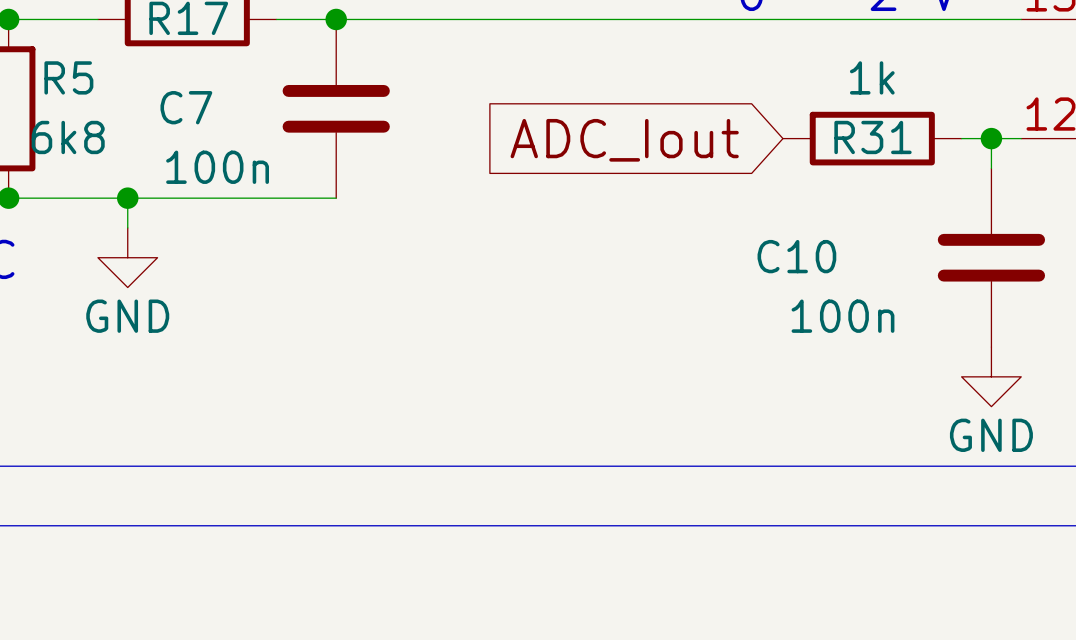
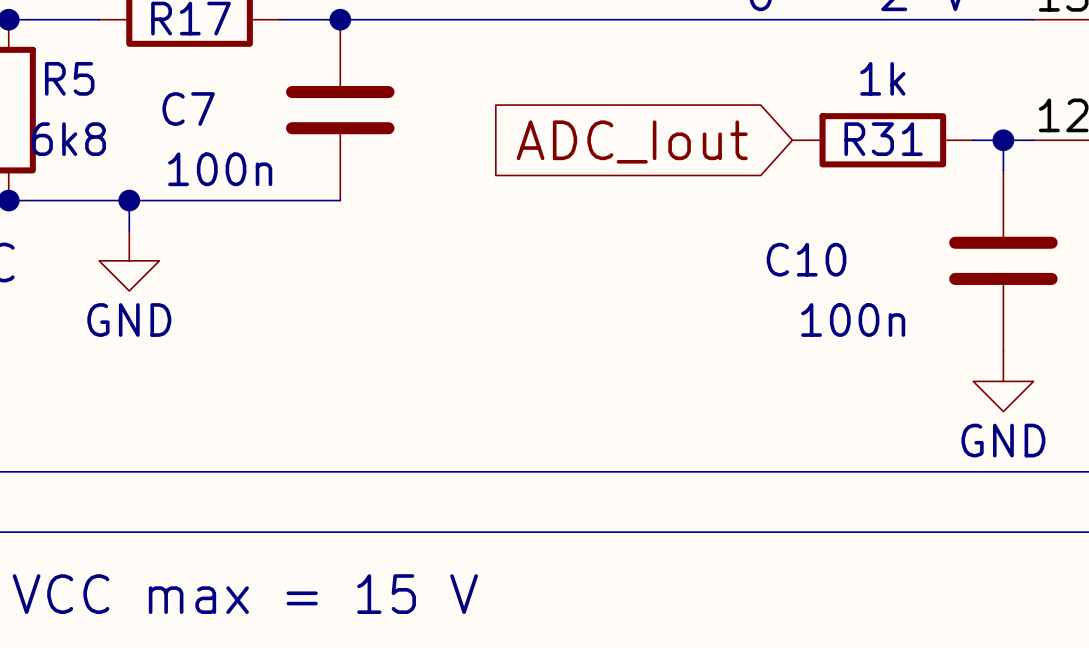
text: none -> VCC max = 15 V (245, 594)

